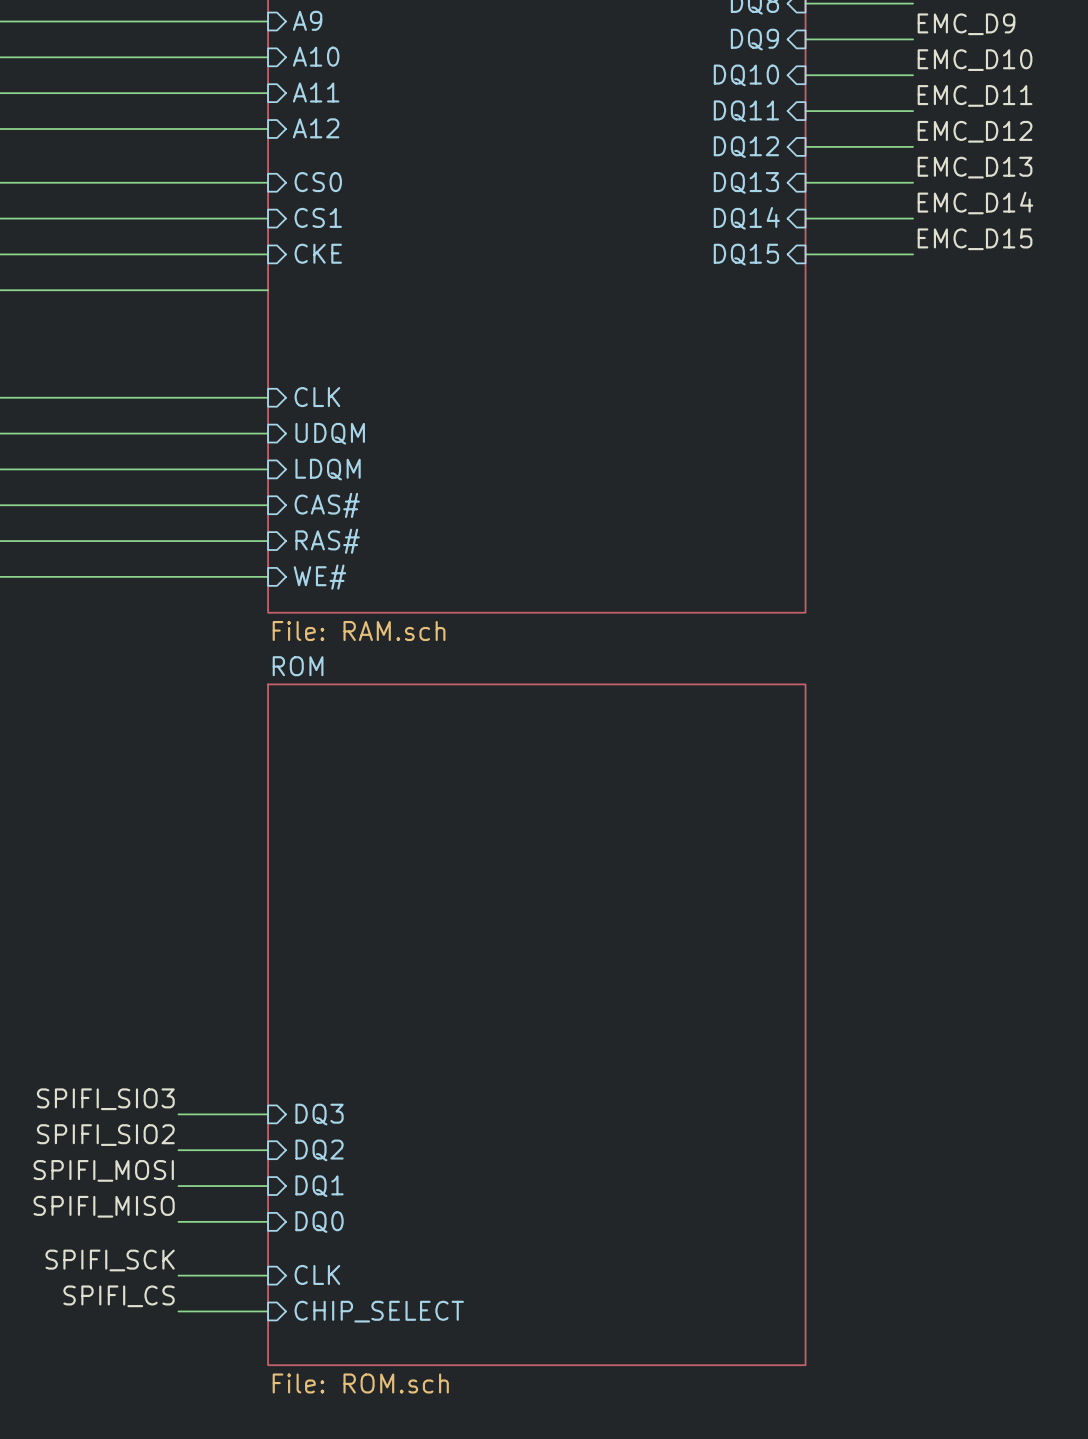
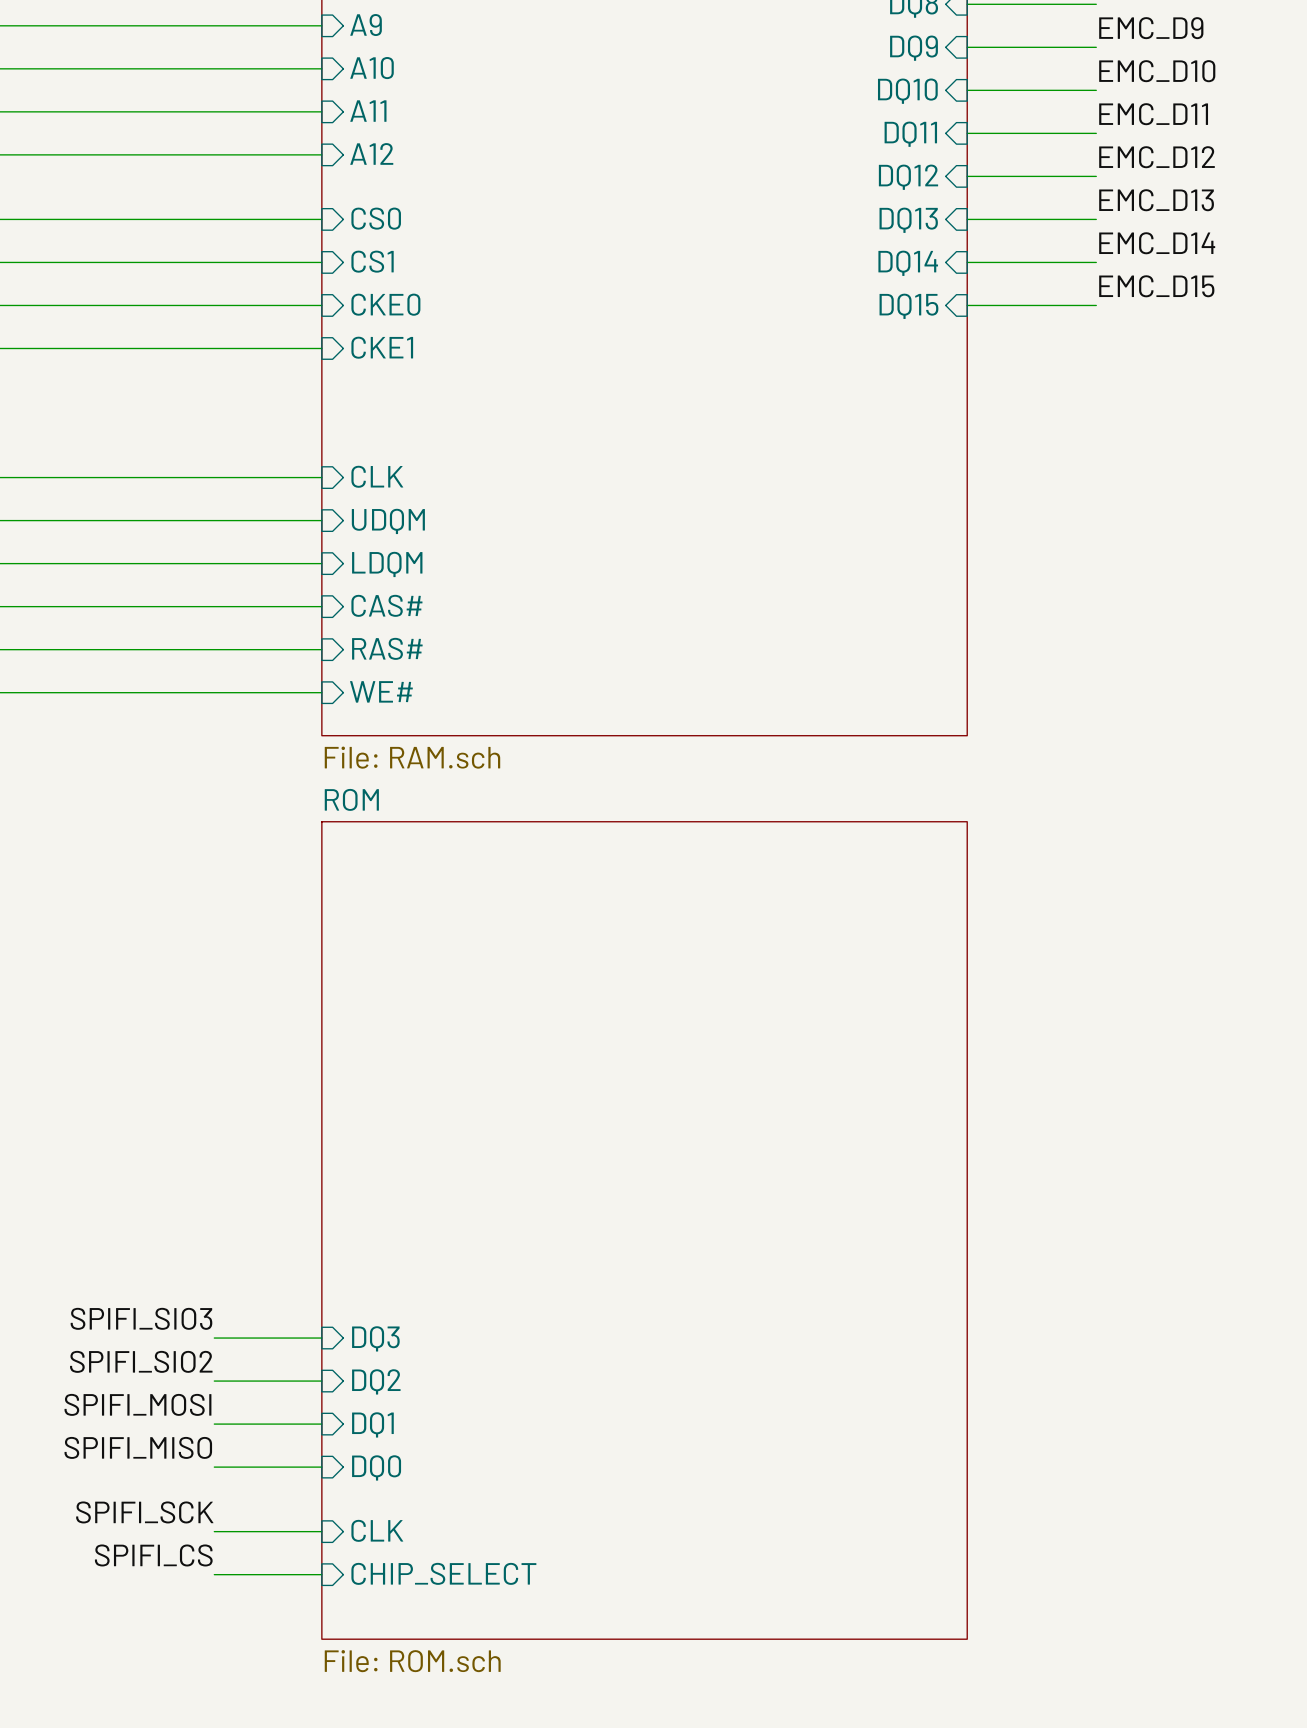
sheet pin: CKE (318, 253) -> CKE0 (385, 304)
sheet pin: none -> CKE1 (382, 347)

